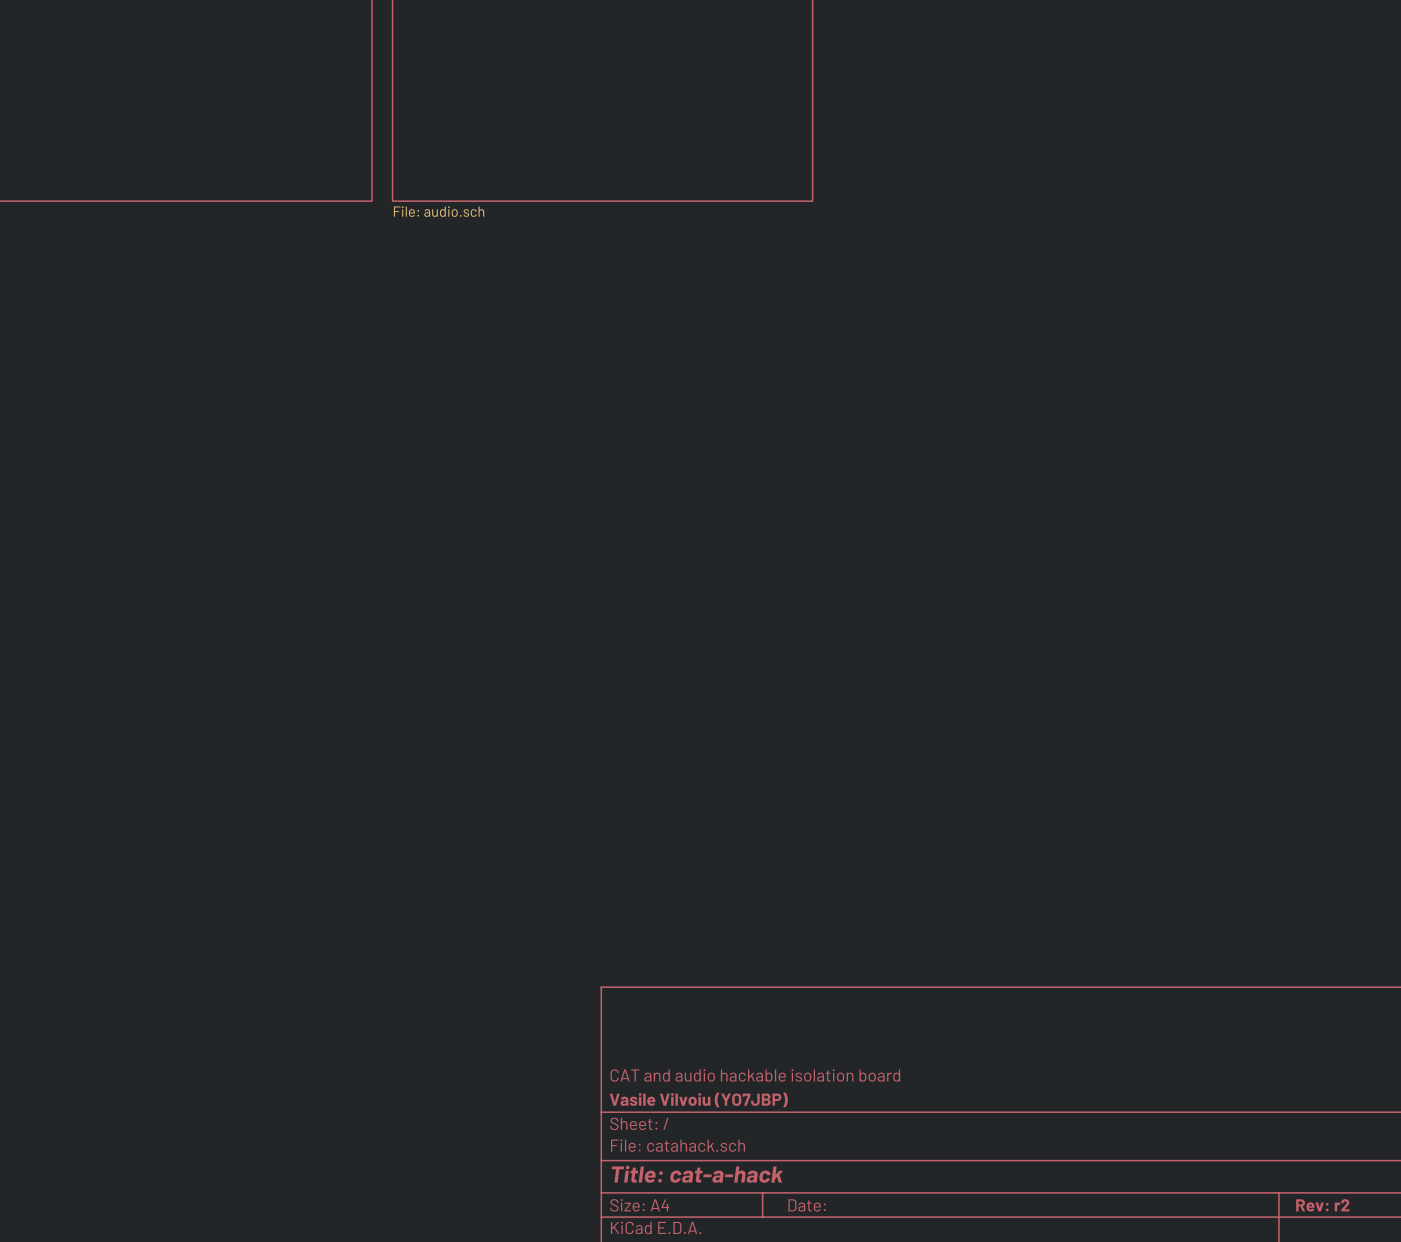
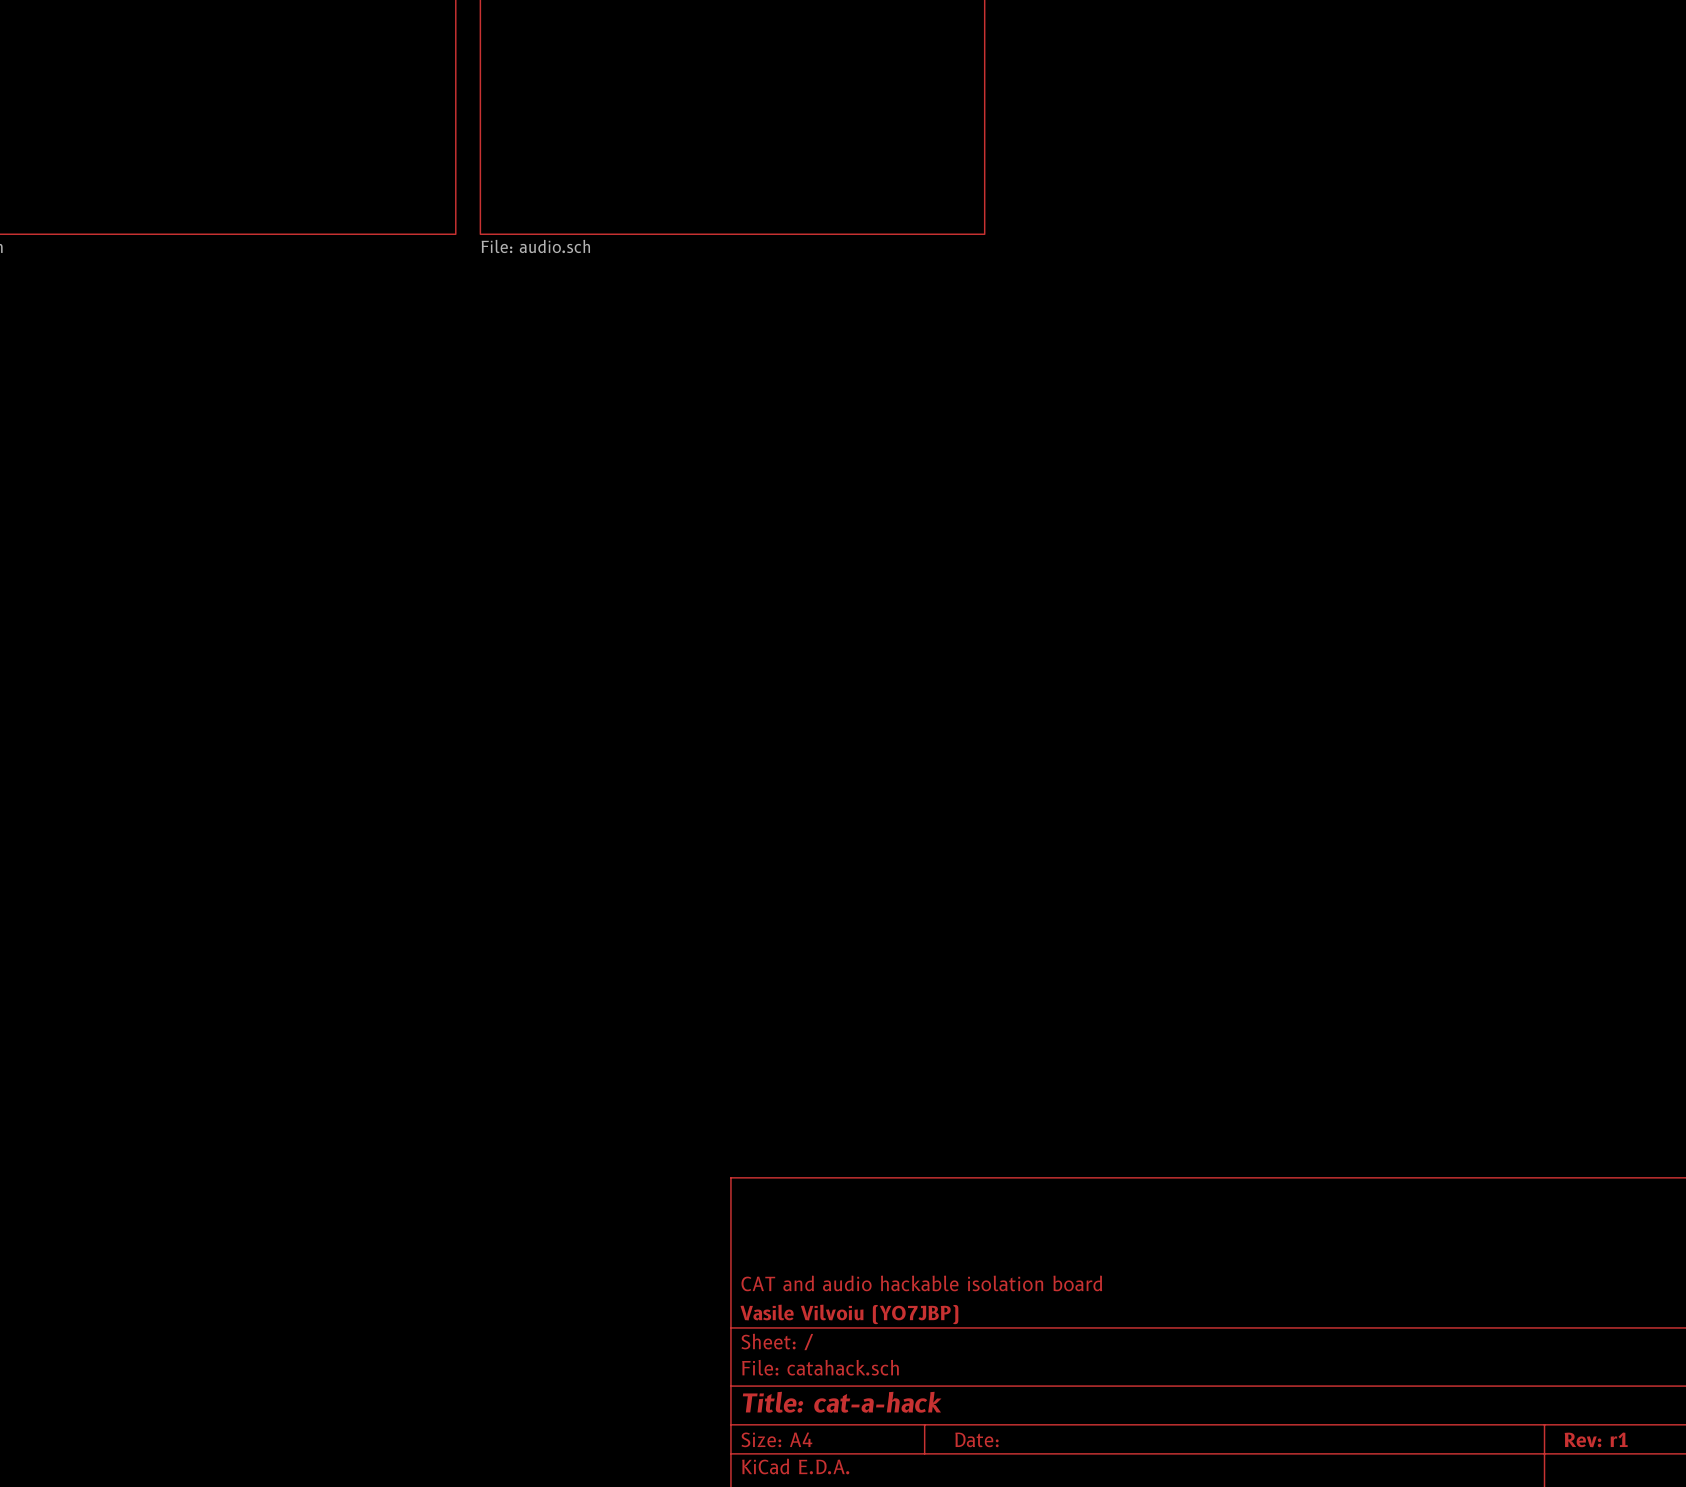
title block: Rev: r2 (1322, 1205) -> Rev: r1 (1596, 1439)

